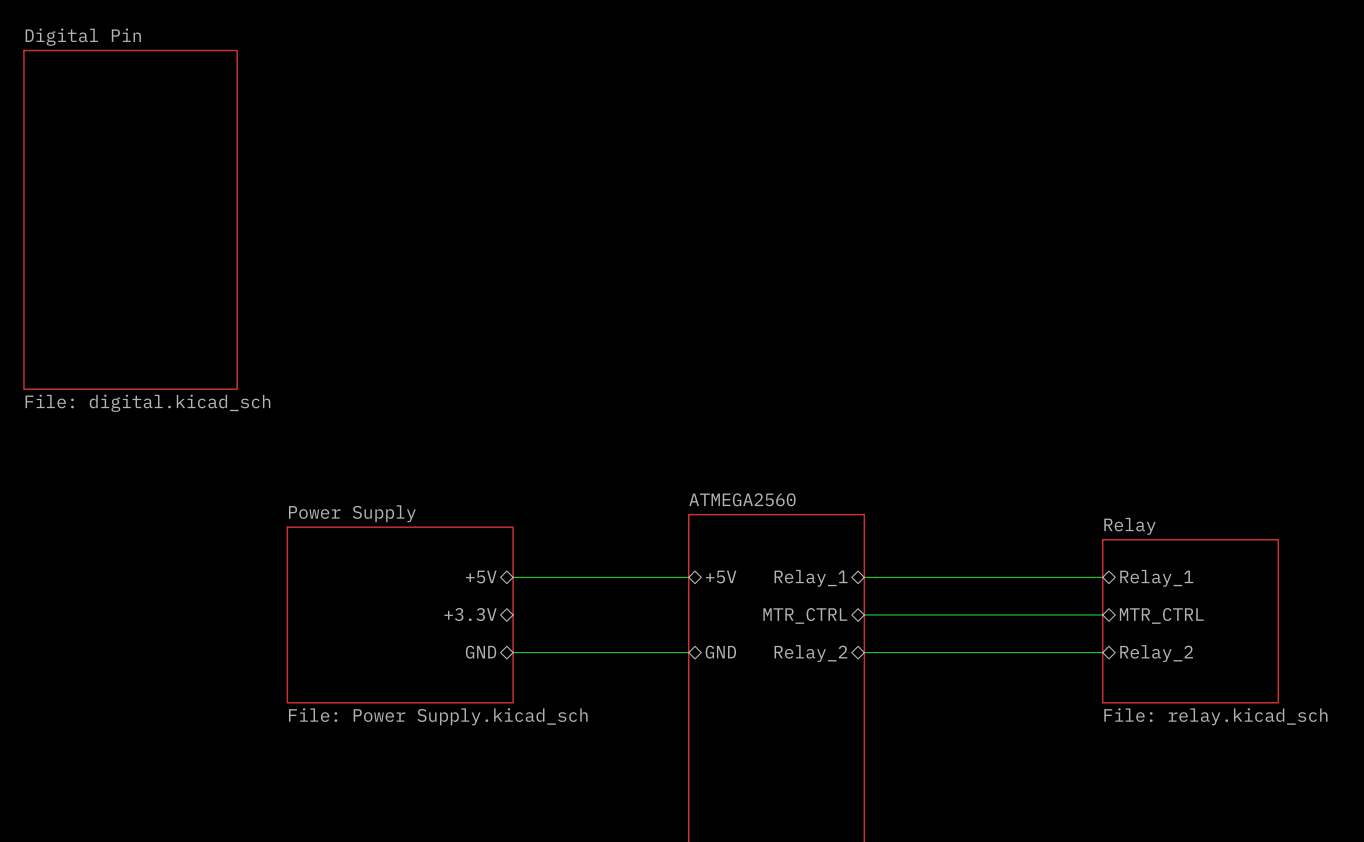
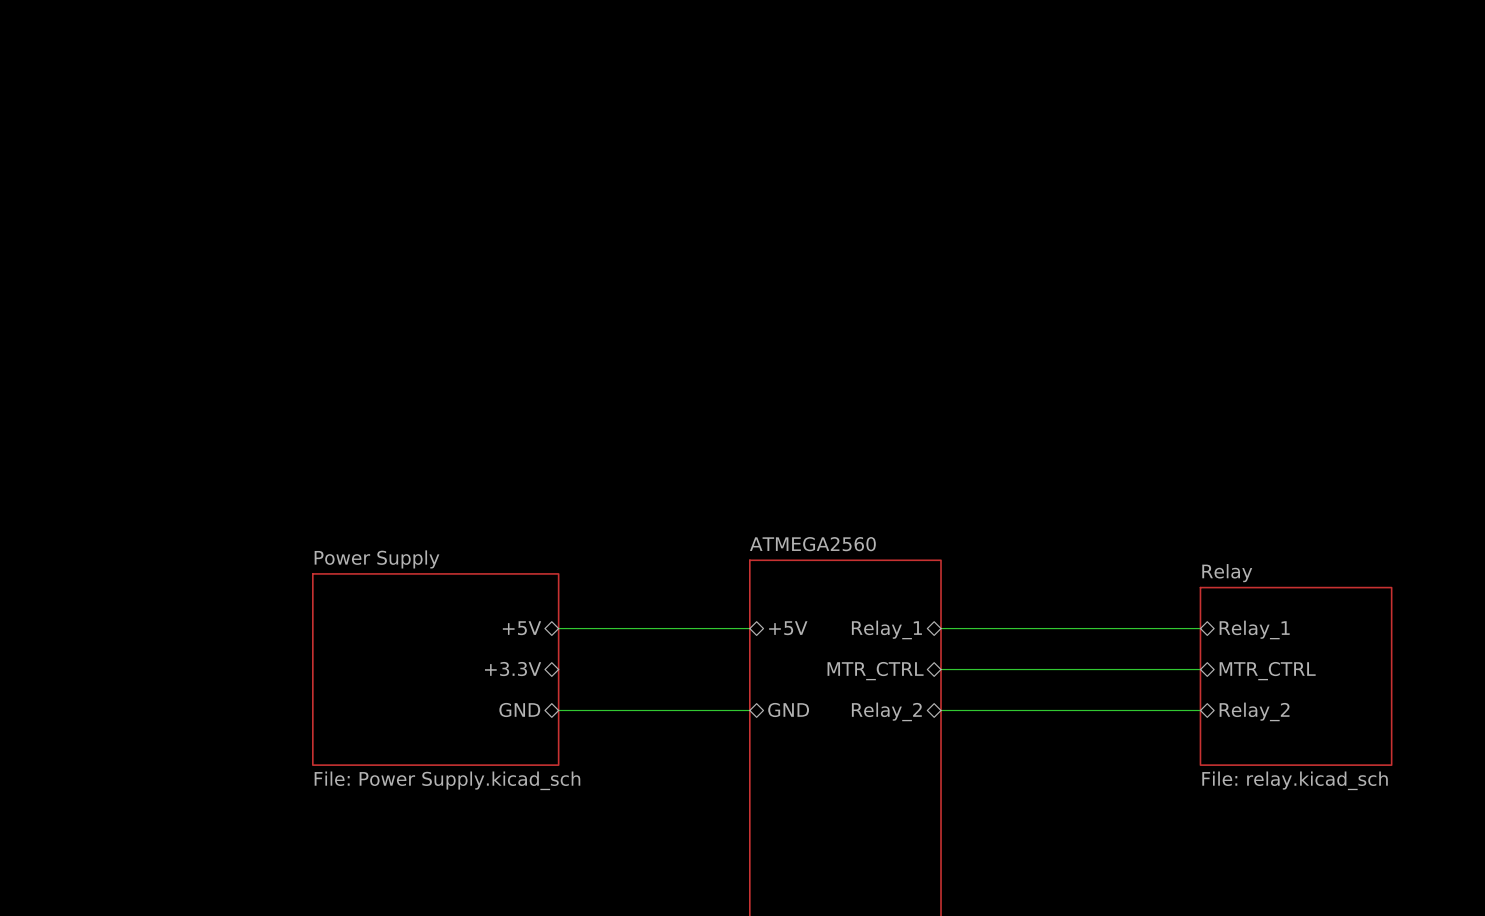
sheet Digital Pin: File: digital.kicad_sch (130, 219) -> none

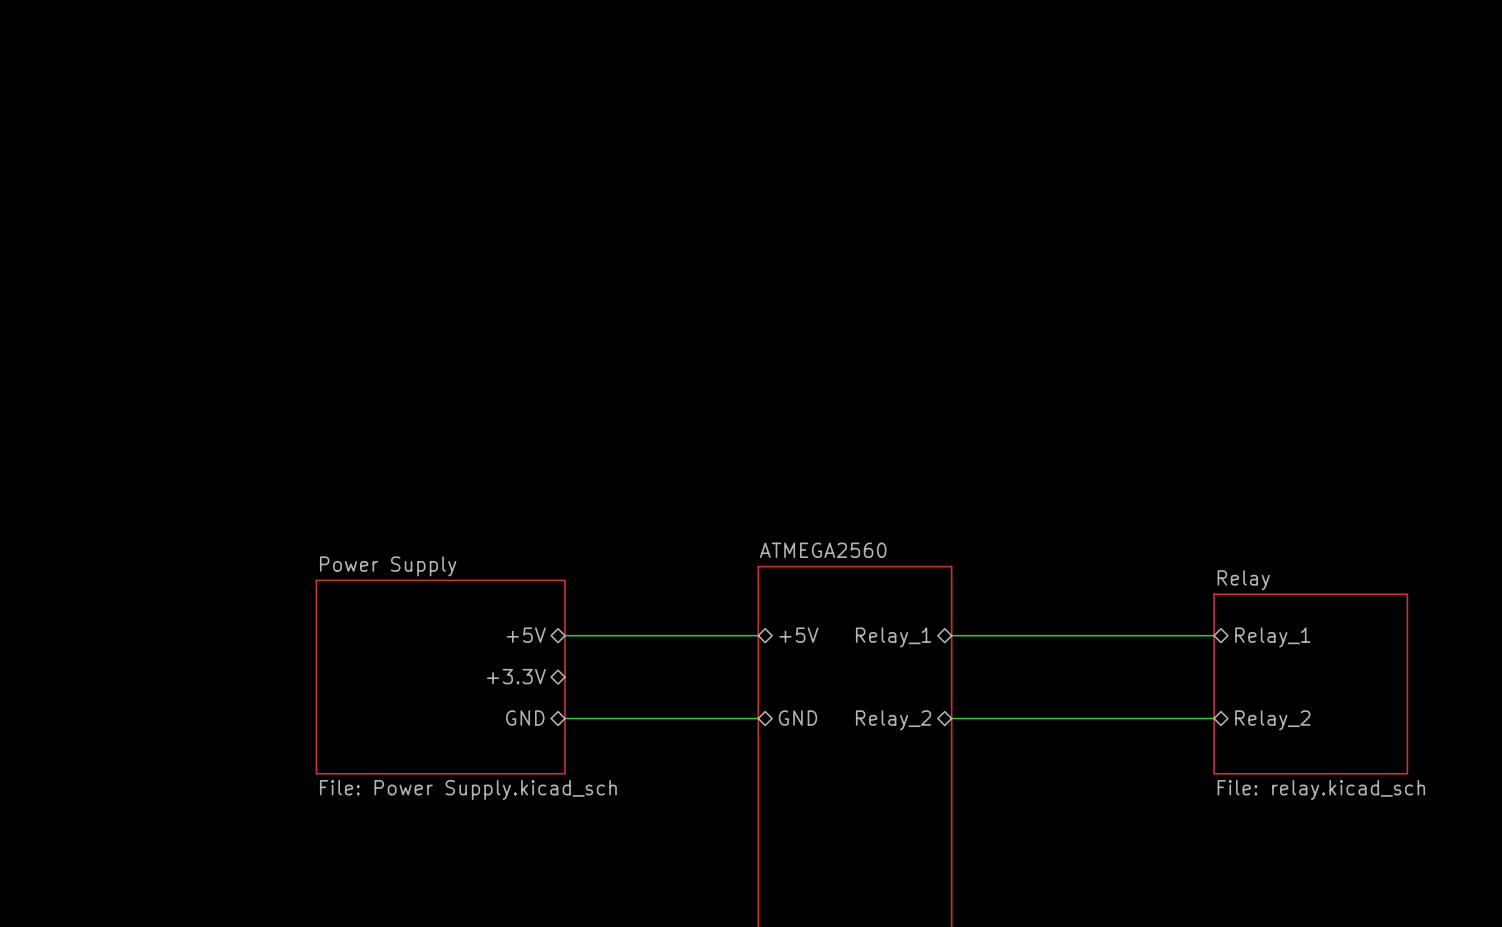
wire: (941, 669) (1200, 669) -> none
sheet pin: MTR_CTRL (875, 671) -> none
sheet pin: MTR_CTRL (1267, 671) -> none

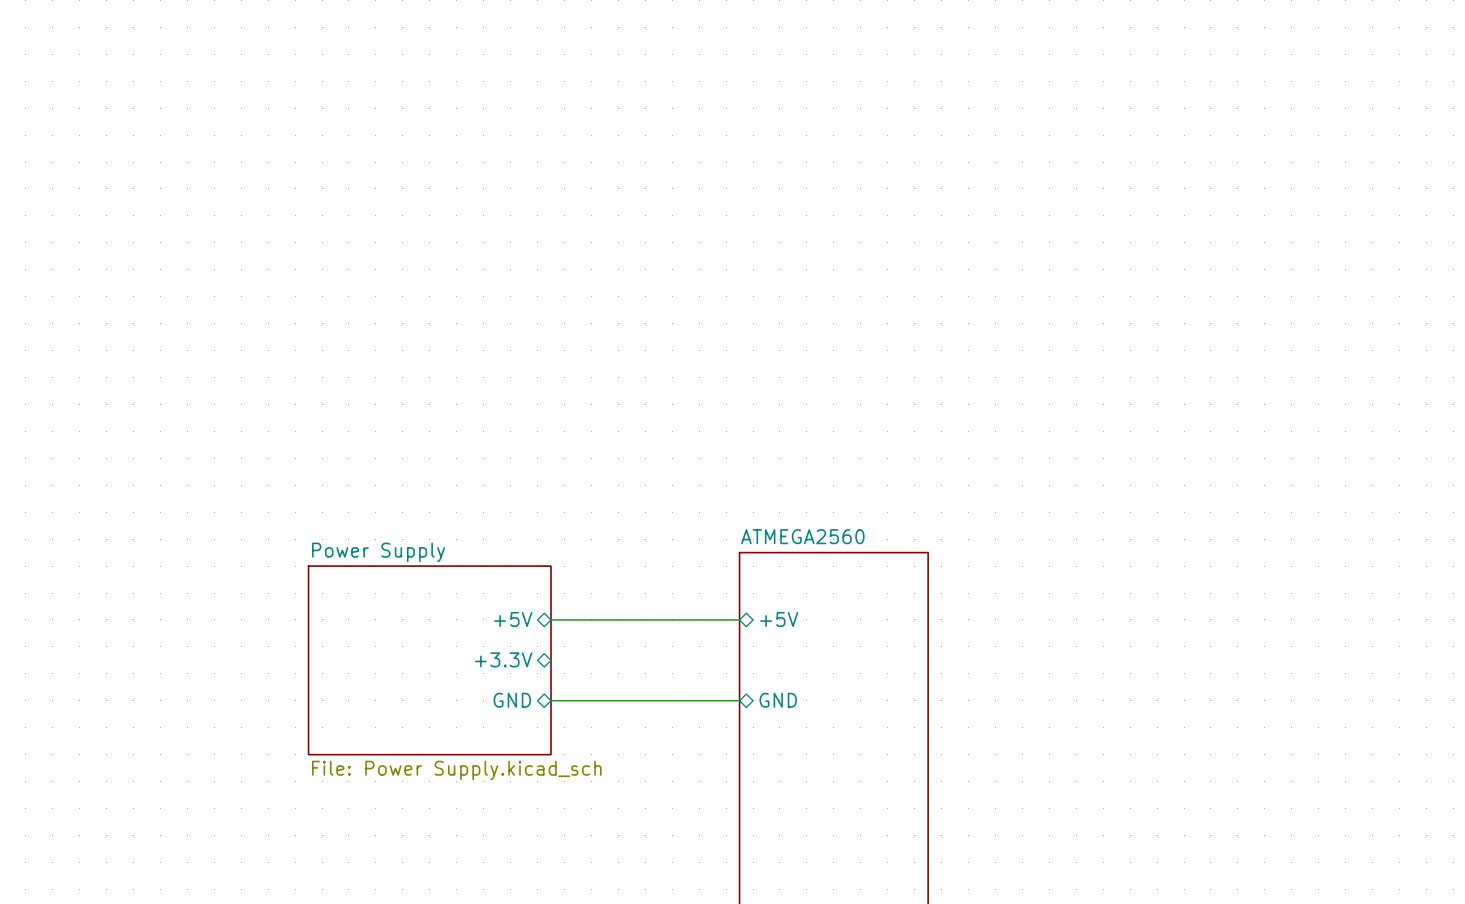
wire: (951, 635) (1214, 635) -> none
sheet pin: Relay_1 (893, 637) -> none
sheet pin: Relay_1 (1272, 637) -> none
sheet Relay: File: relay.kicad_sch (1310, 684) -> none
wire: (951, 718) (1214, 718) -> none
sheet pin: Relay_2 (893, 720) -> none
sheet pin: Relay_2 (1272, 720) -> none

